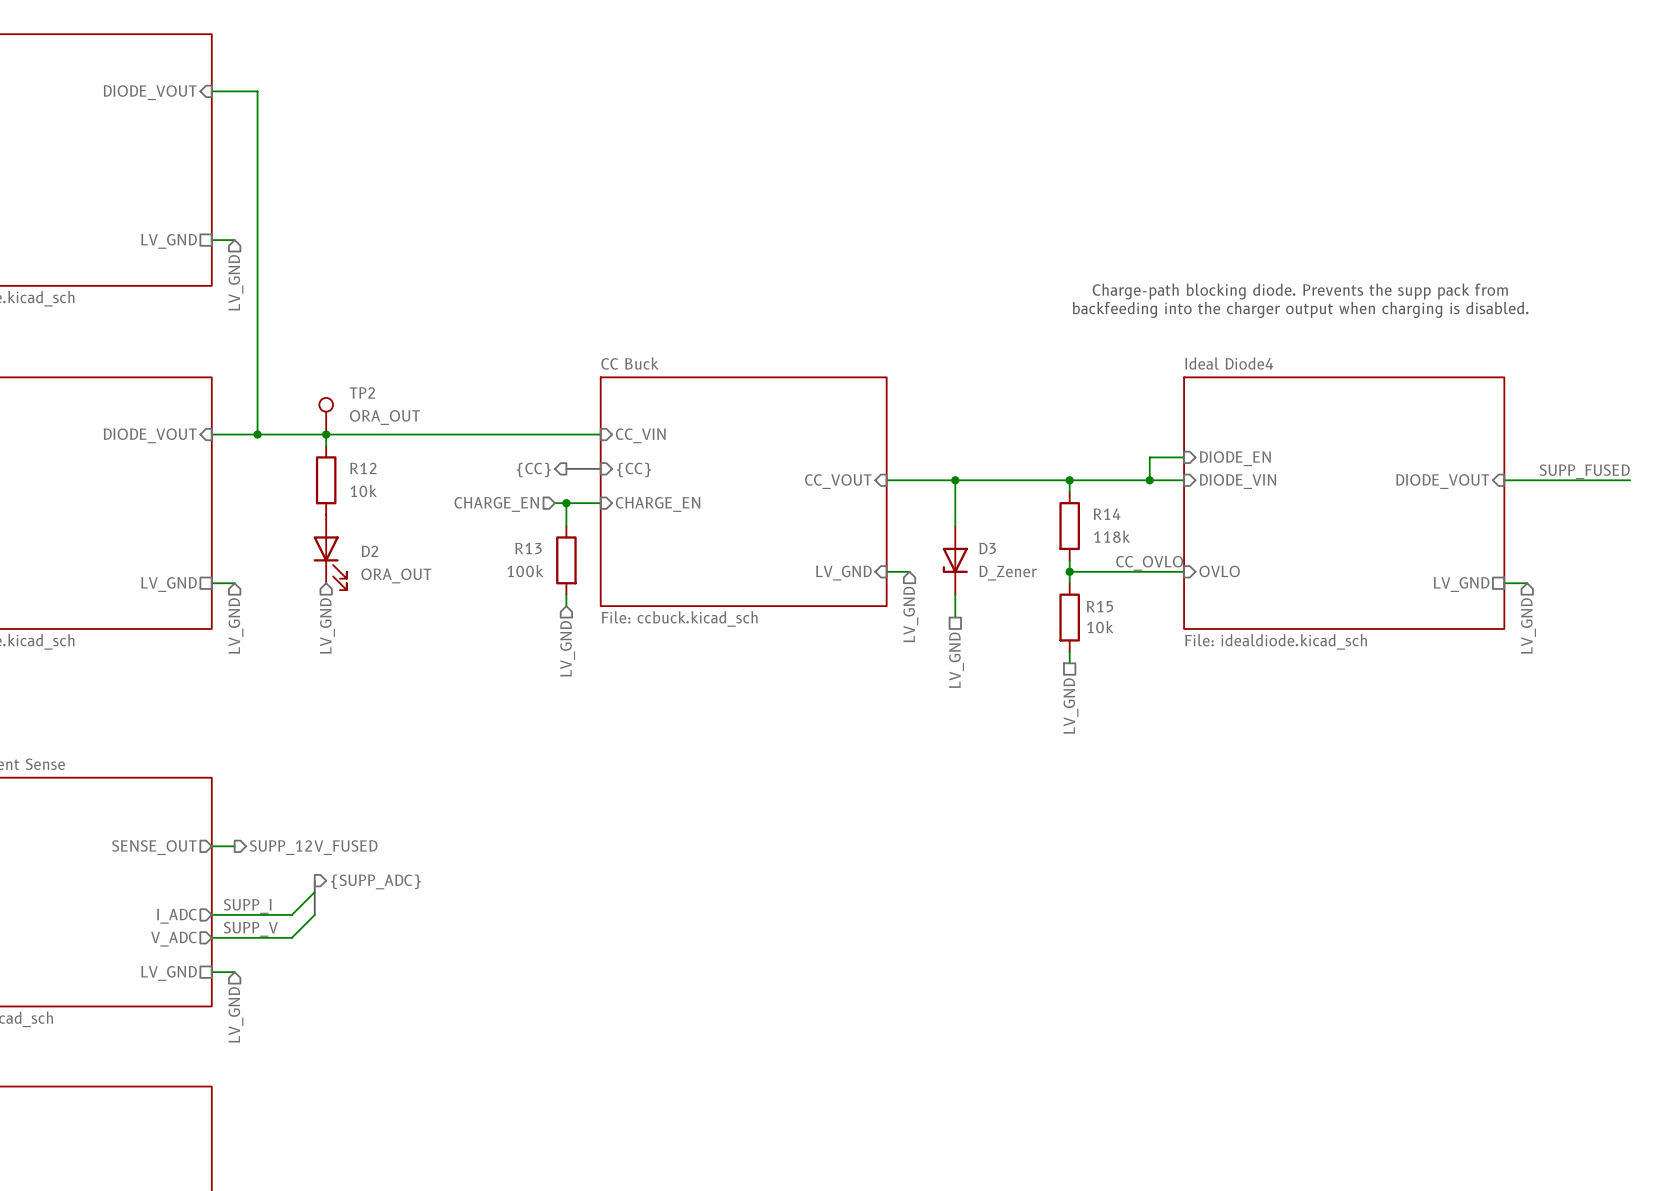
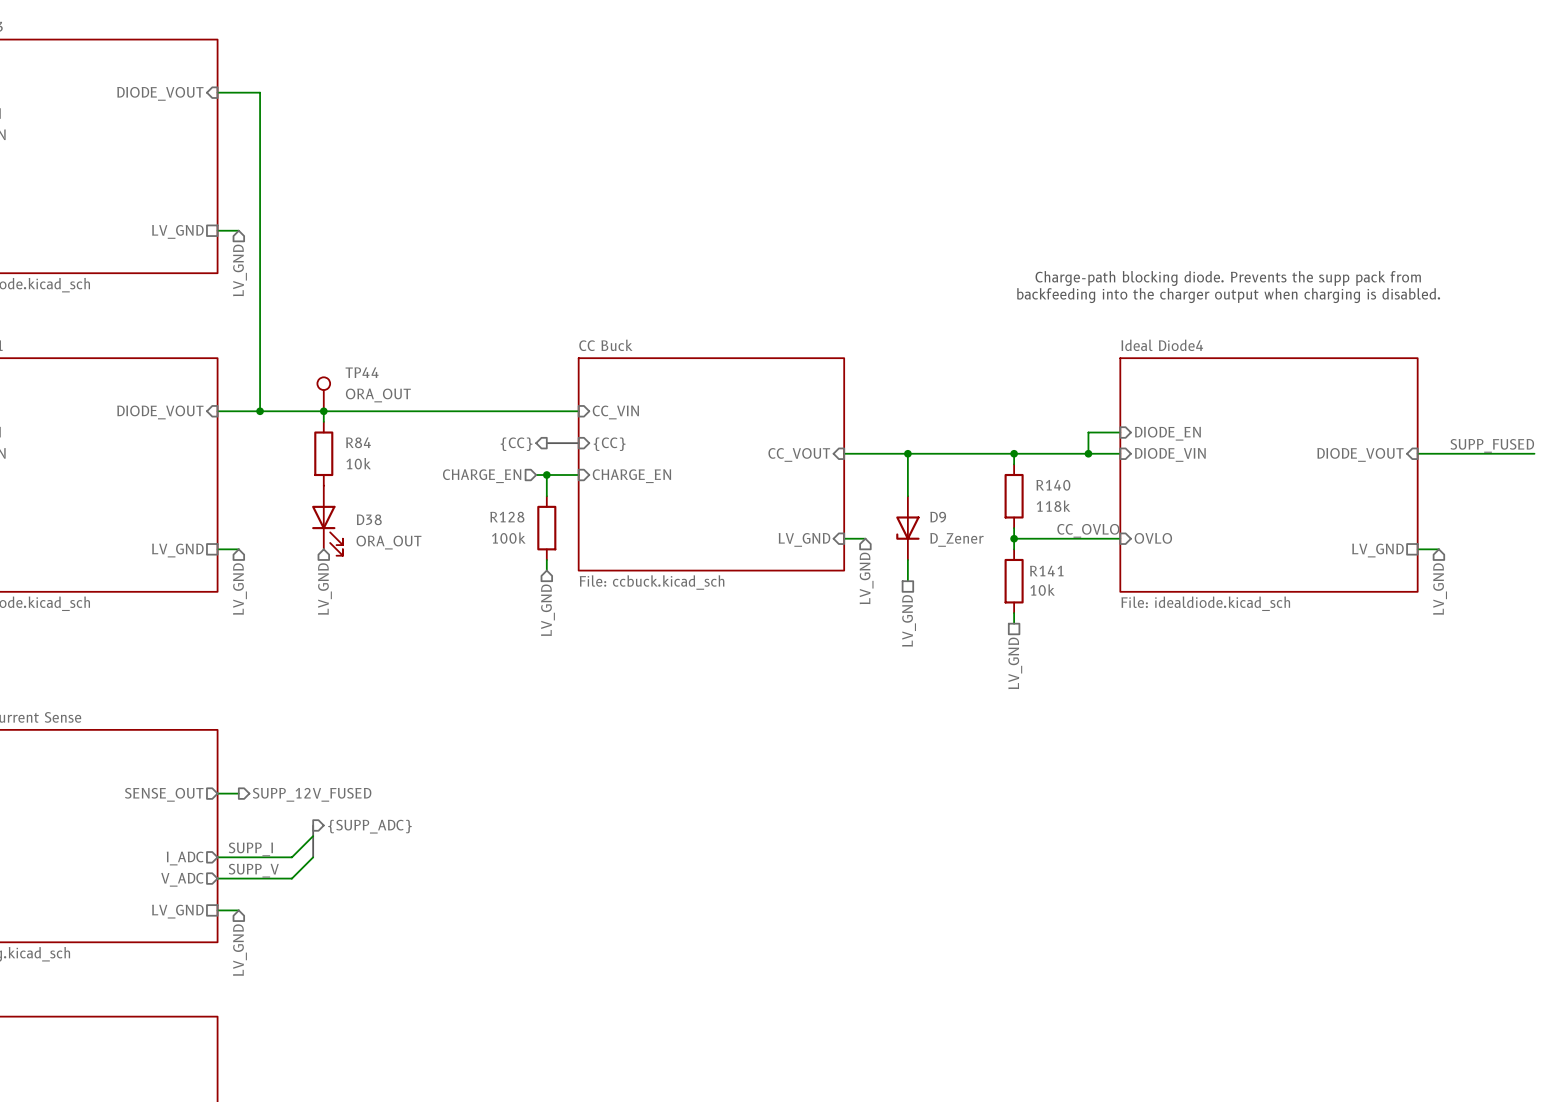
TP2 name: TP2 (362, 392) -> TP44 (362, 372)
R12 name: R12 (363, 468) -> R84 (358, 442)
R14 name: R14 (1107, 514) -> R140 (1053, 485)
R13 name: R13 (528, 548) -> R128 (507, 517)
D3 name: D3 (987, 548) -> D9 (938, 517)
D2 name: D2 (370, 551) -> D38 (369, 519)
R15 name: R15 (1100, 606) -> R141 (1046, 571)

